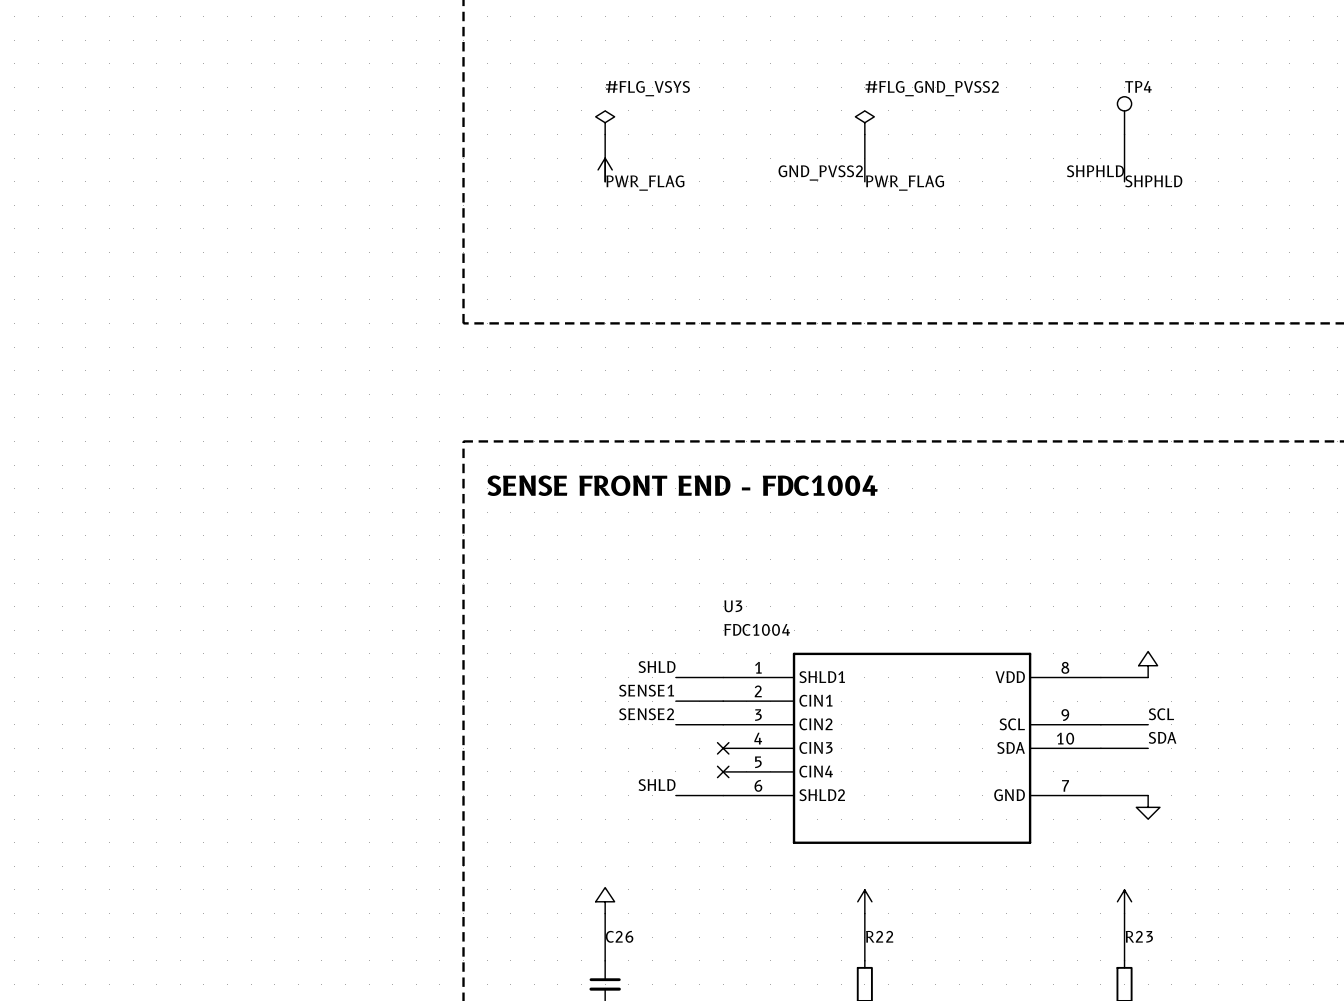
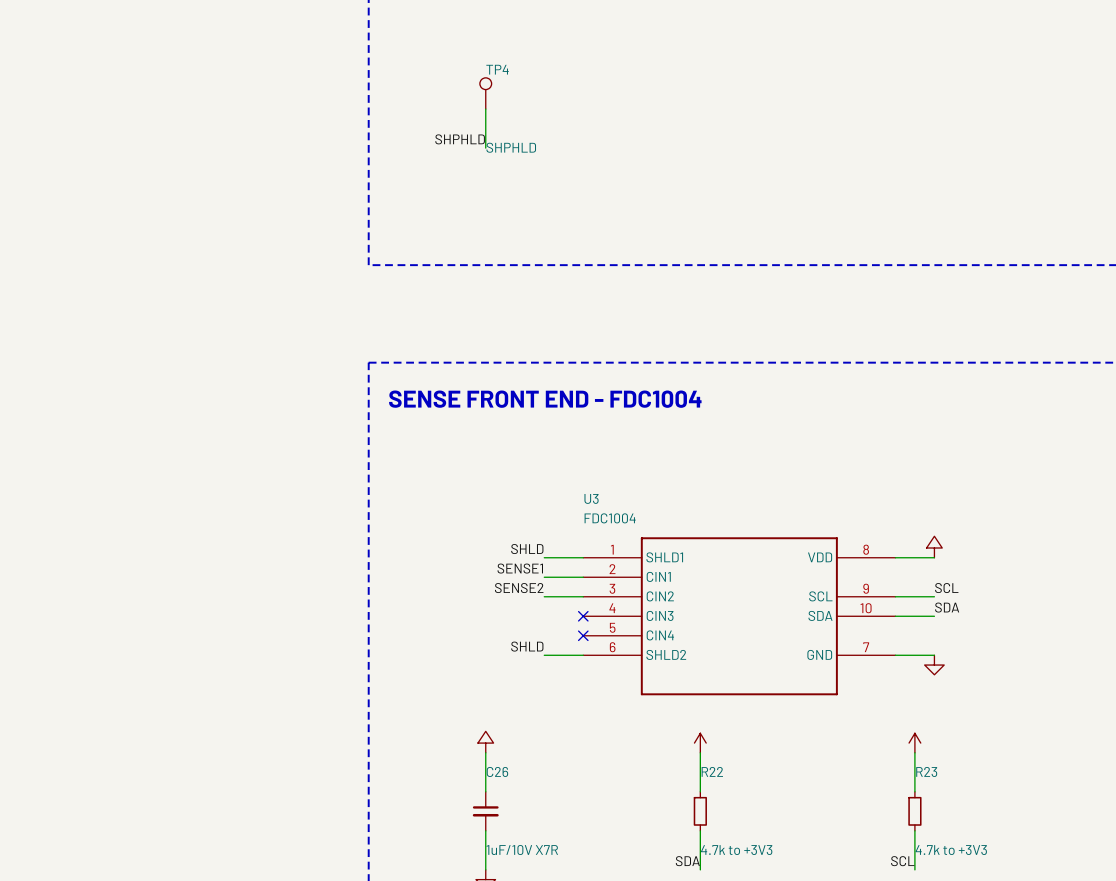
TP4 position: (1124, 115) -> (485, 93)
#FLG_VSYS: PWR_FLAG (605, 122) -> none
#FLG_GND_PVSS2: PWR_FLAG (864, 122) -> none
wire: (864, 134) (864, 181) -> none
wire: (1124, 134) (1124, 181) -> none
power symbol: (605, 169) -> none
label: none -> SHPHLD (460, 139)
label: SHPHLD (1095, 171) -> none
label: GND_PVSS2 (820, 172) -> none

